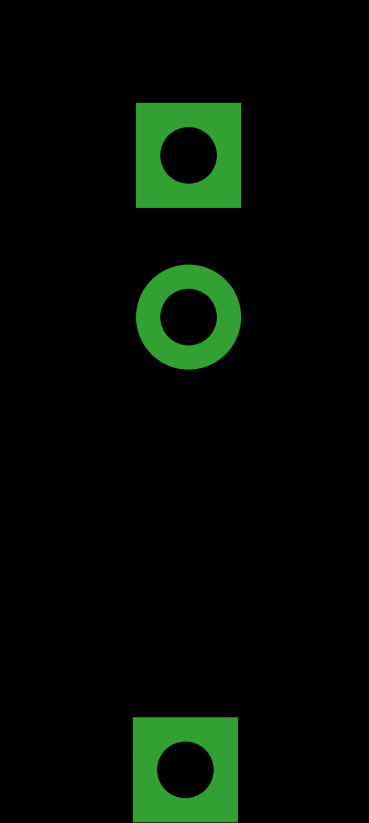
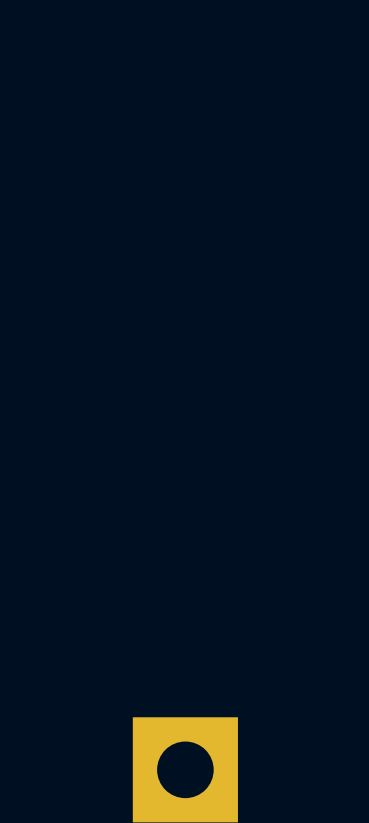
part: (188, 236) -> none

